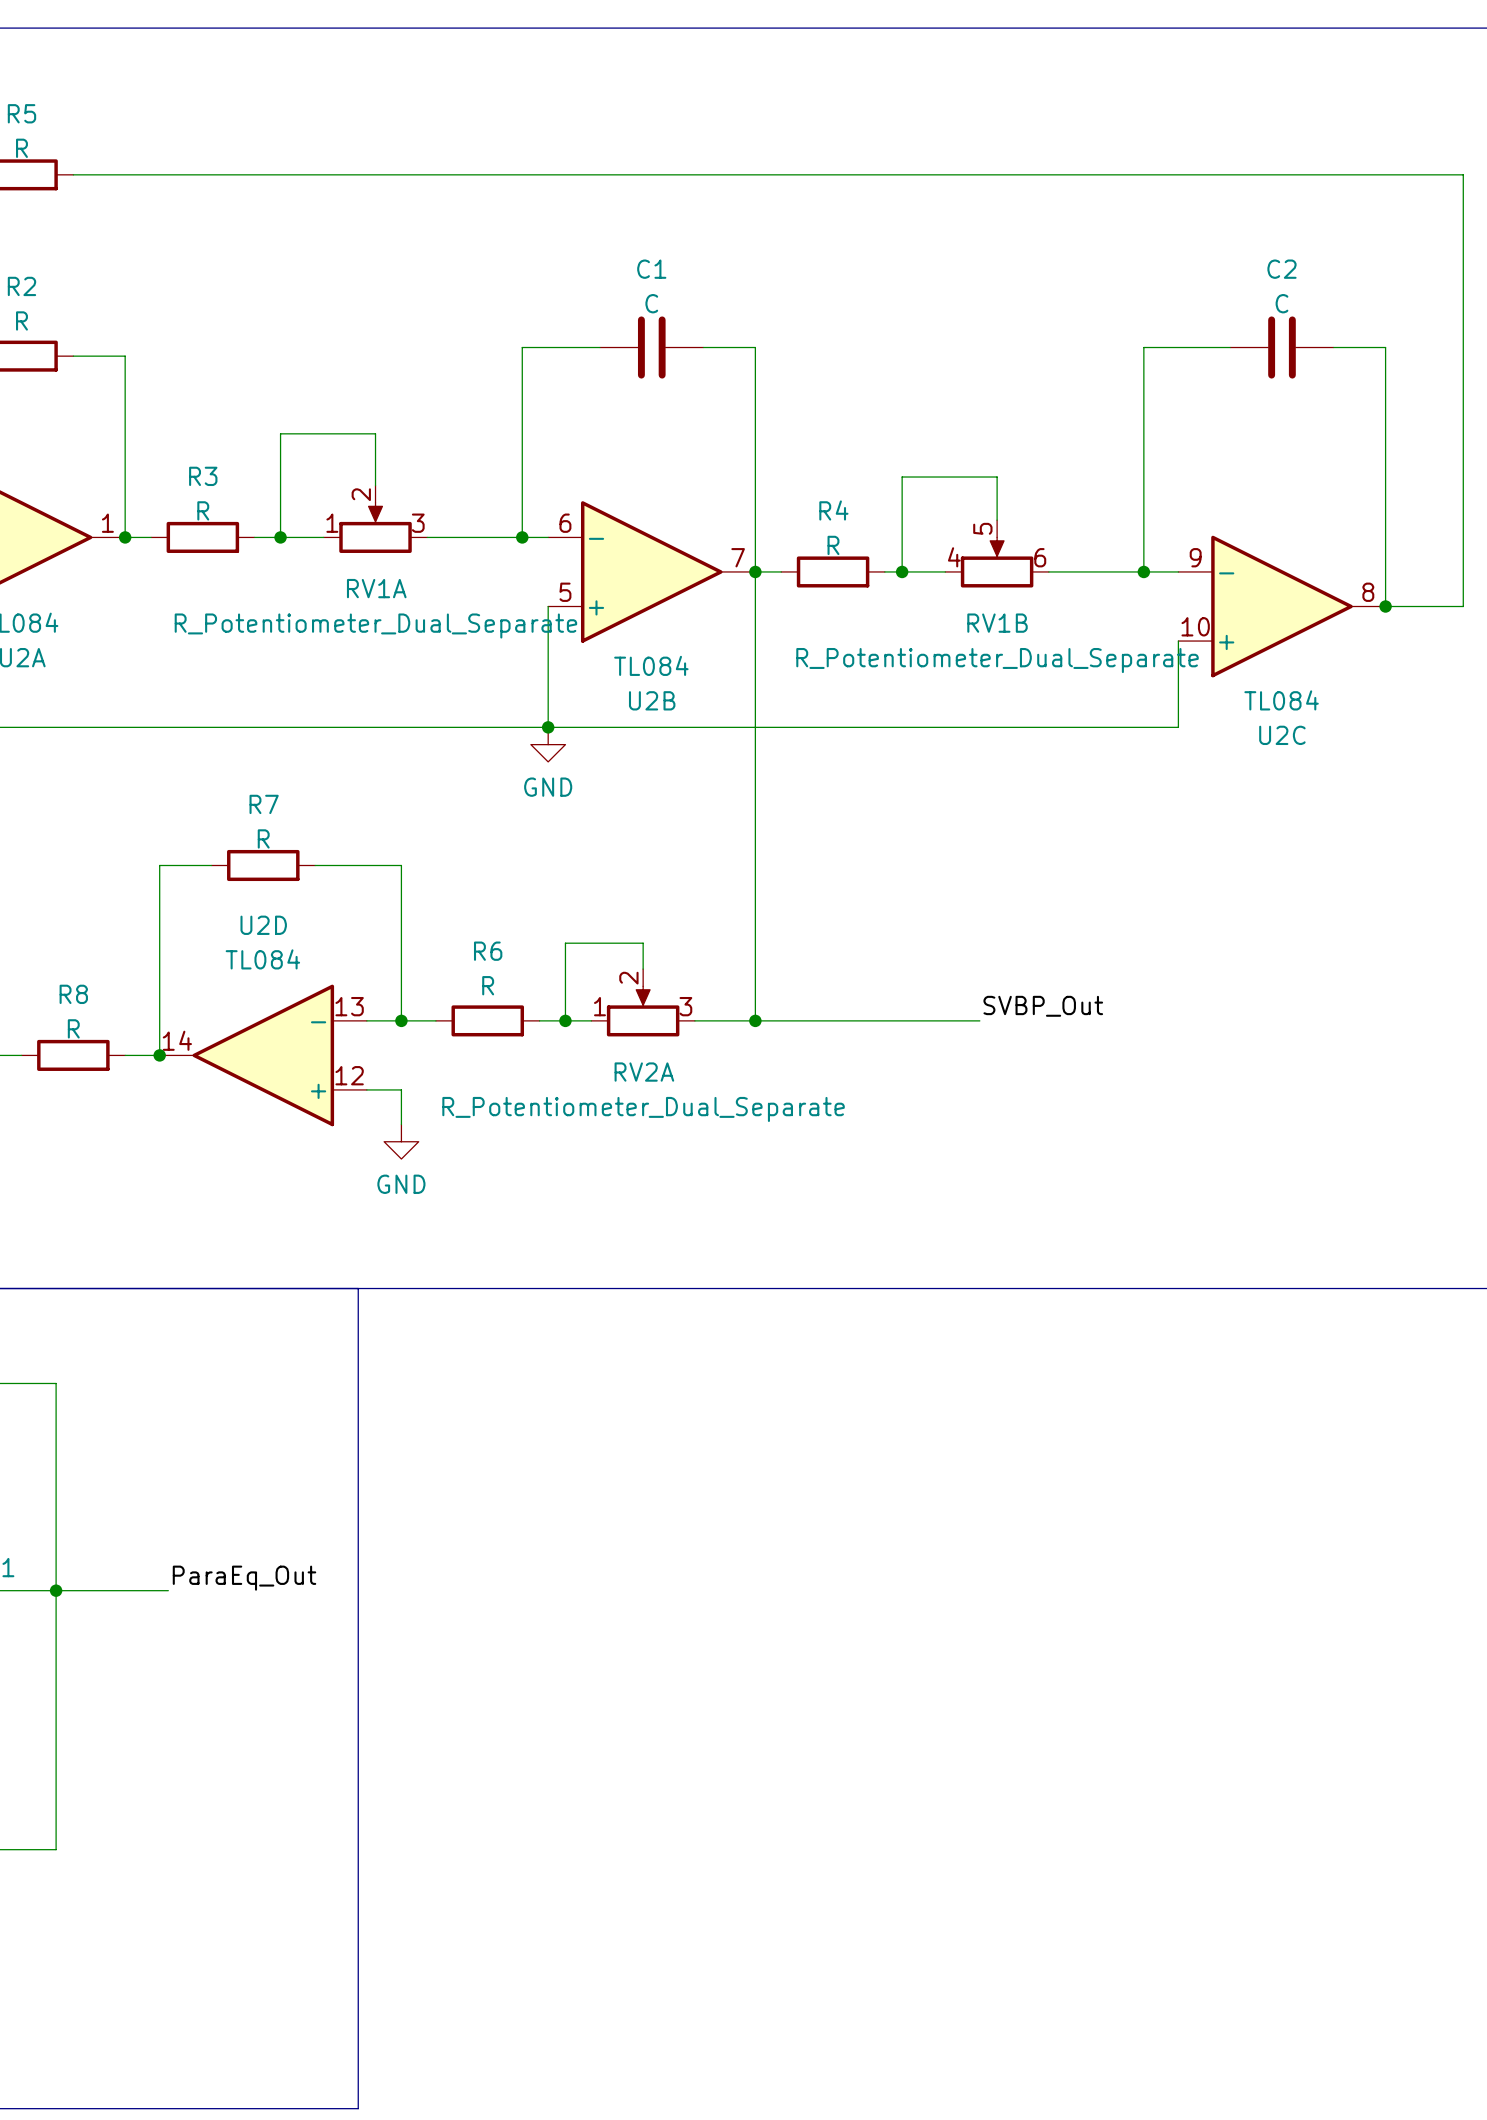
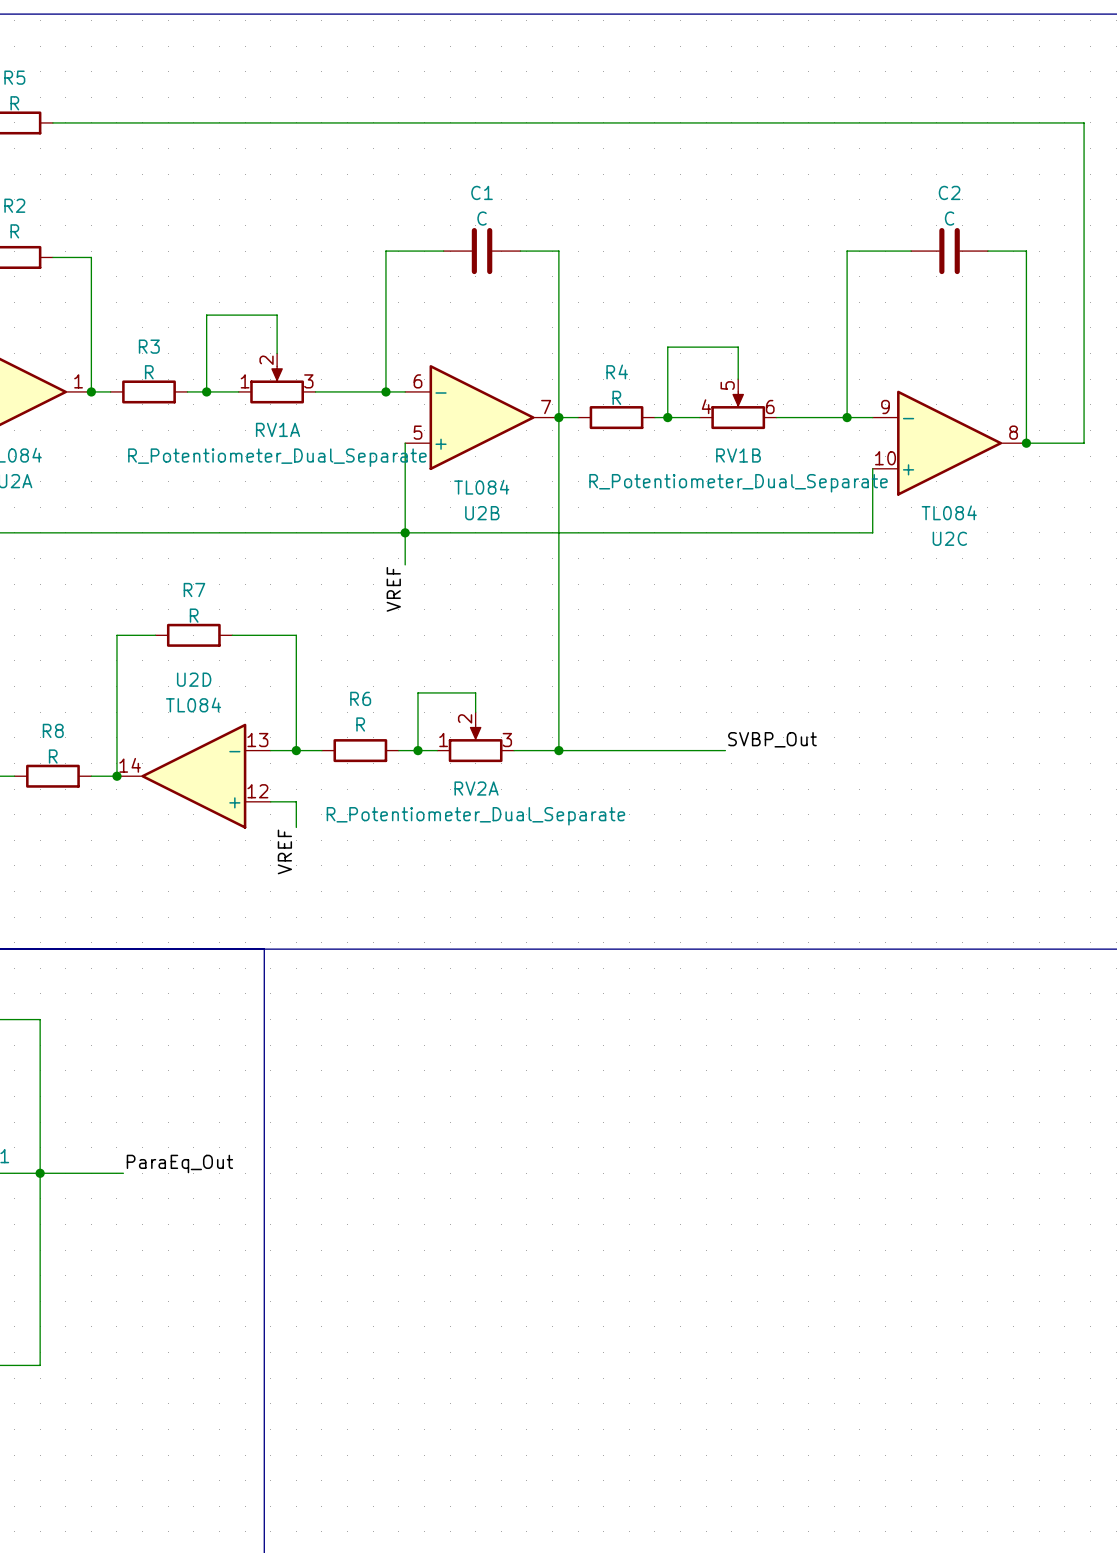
wire: none -> (405, 532) (405, 564)
power symbol: GND (548, 744) -> none
label: none -> VREF (393, 589)
power symbol: GND (401, 1141) -> none
label: none -> VREF (284, 851)

